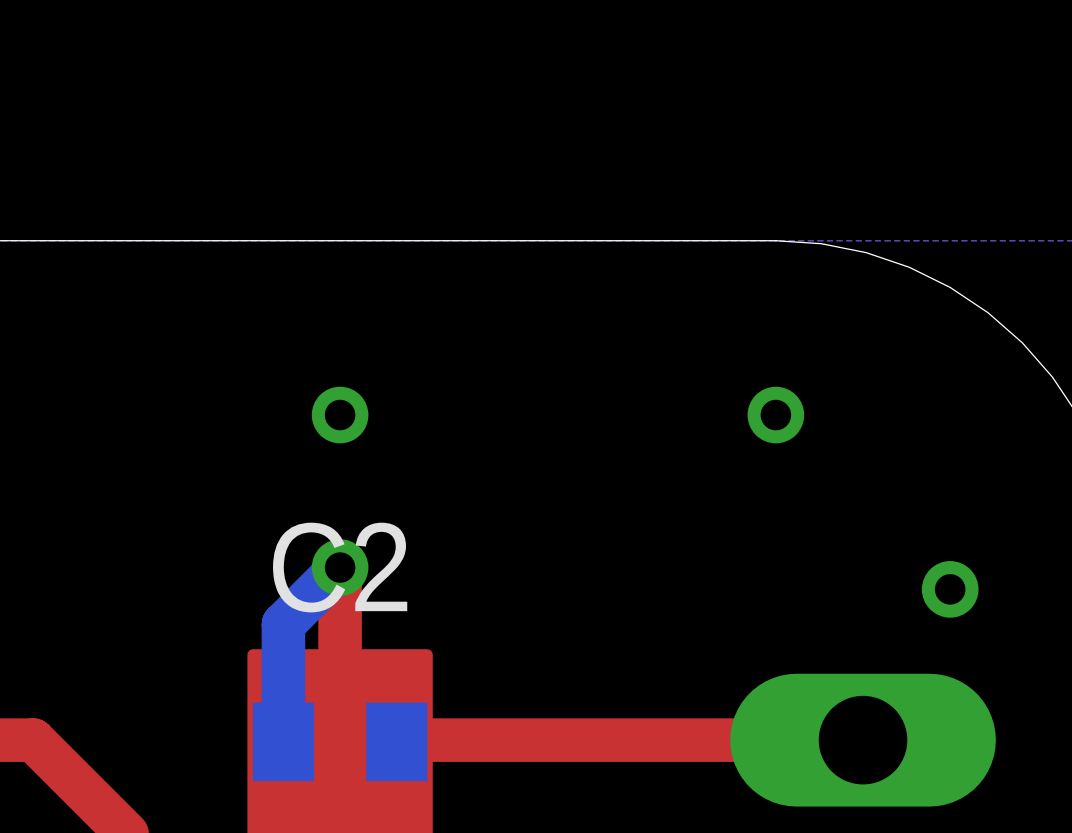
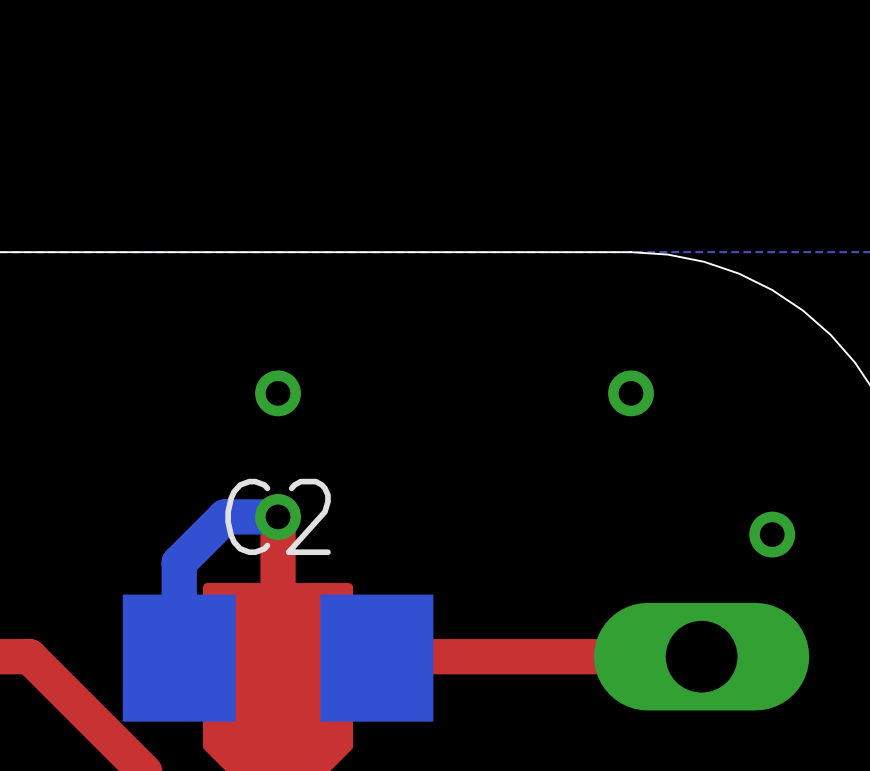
bottom track: (340, 567) (283, 624) (283, 741) -> (278, 516) (225, 516) (179, 562) (179, 658)
C2 footprint: [252, 702, 428, 782] -> [122, 594, 434, 722]

